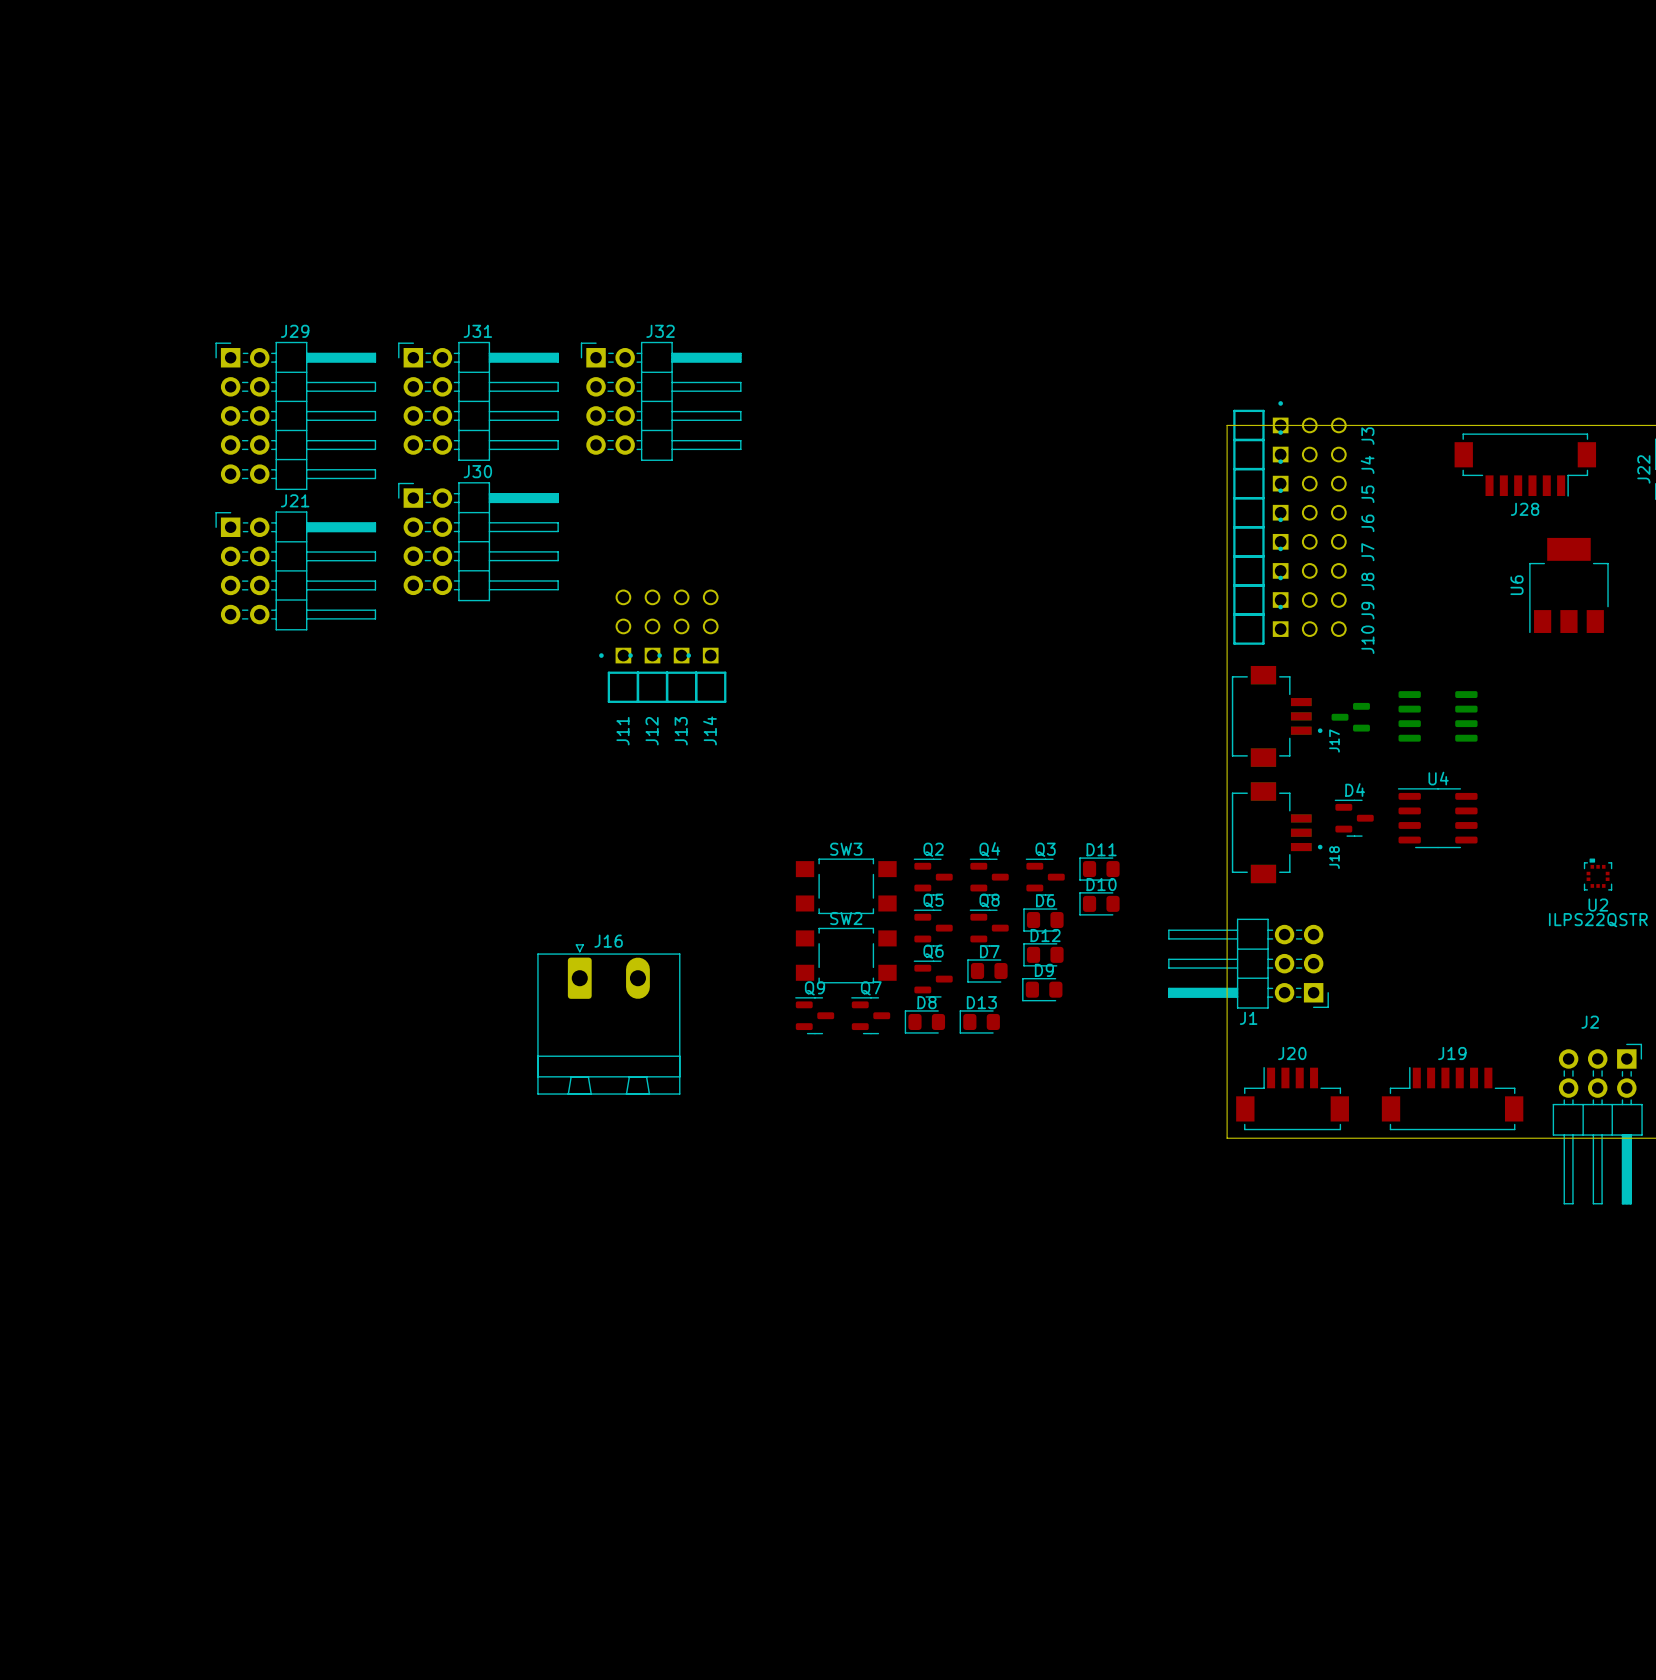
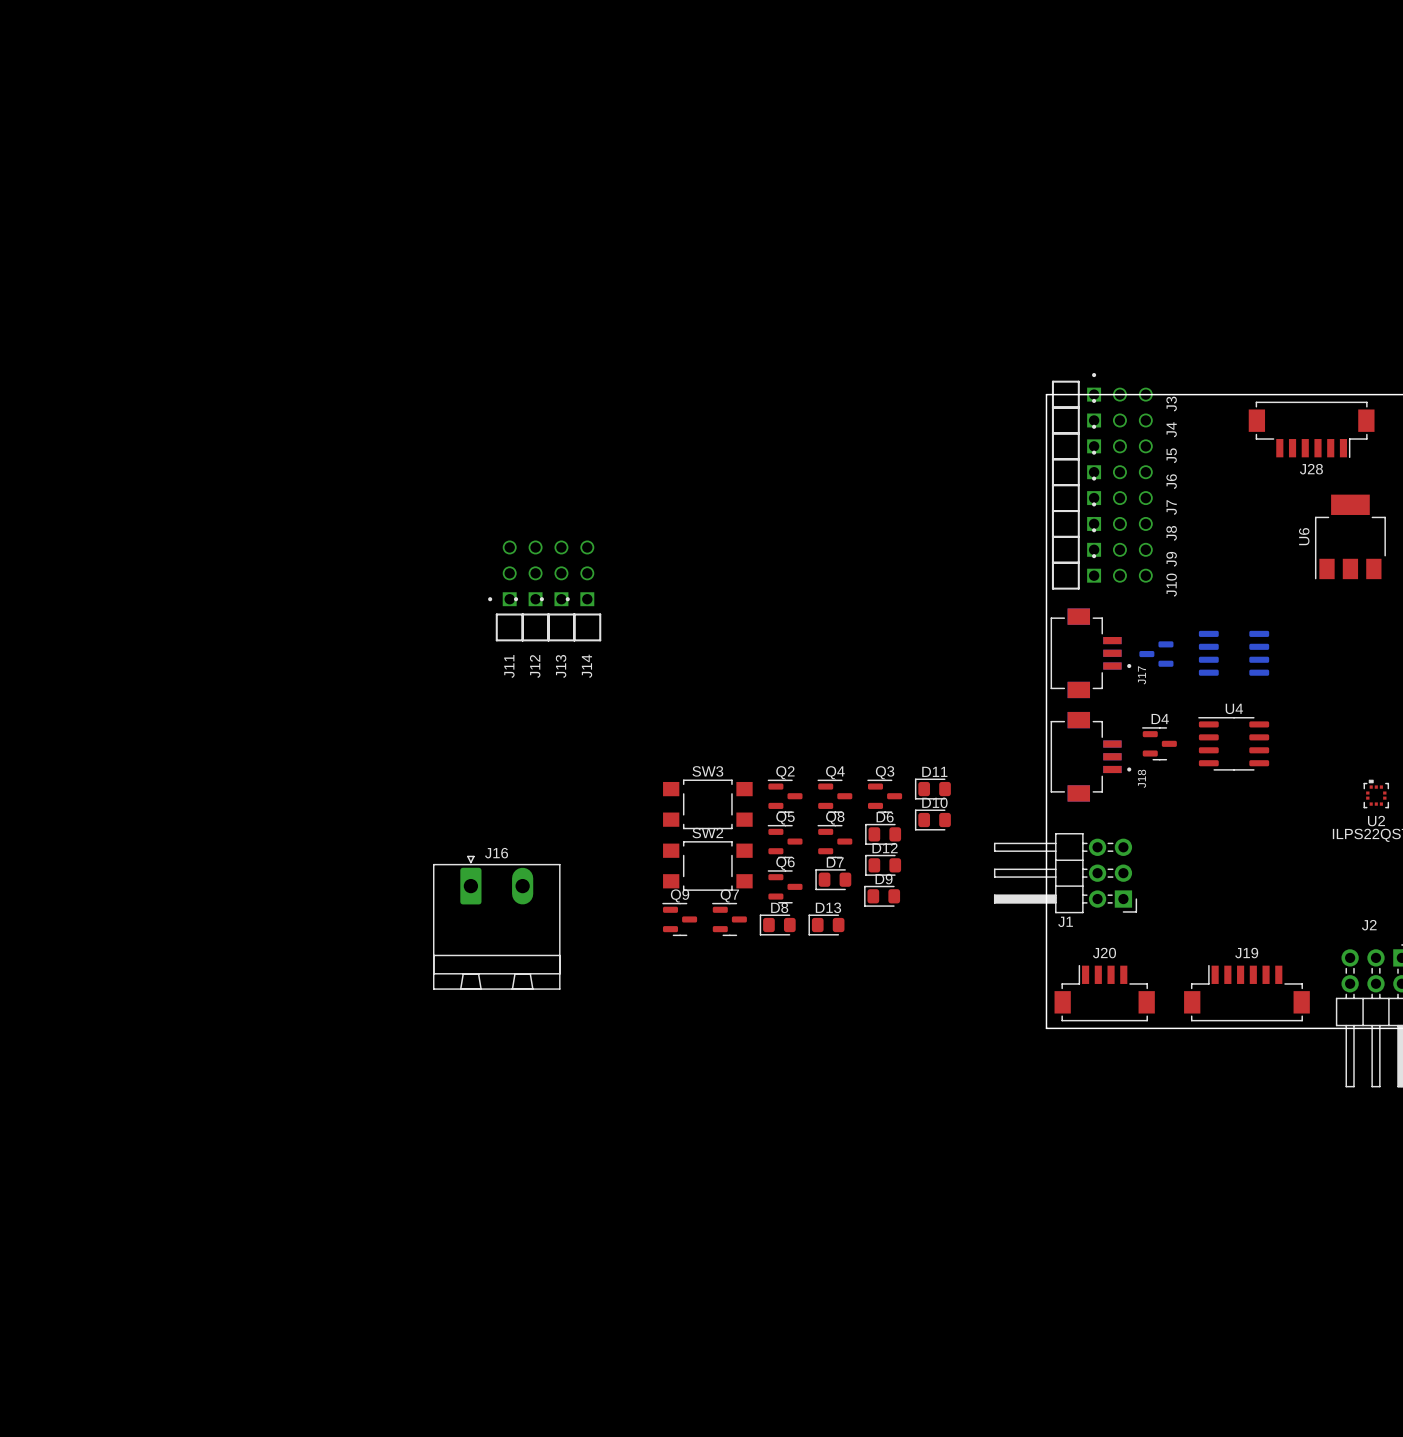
J31: (478, 401) -> none
J32: (661, 401) -> none
J29: (295, 415) -> none
J30: (478, 541) -> none
J21: (295, 570) -> none

